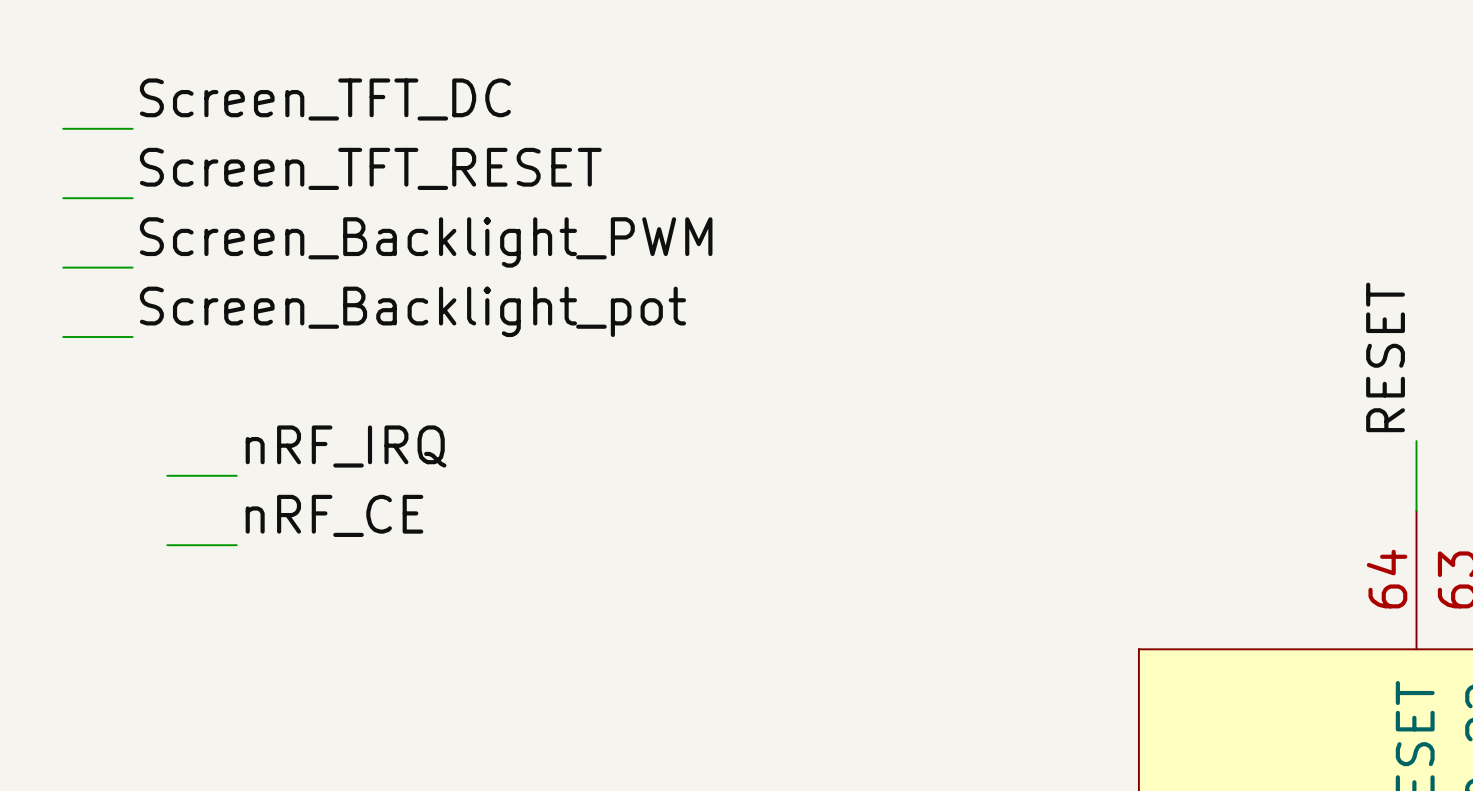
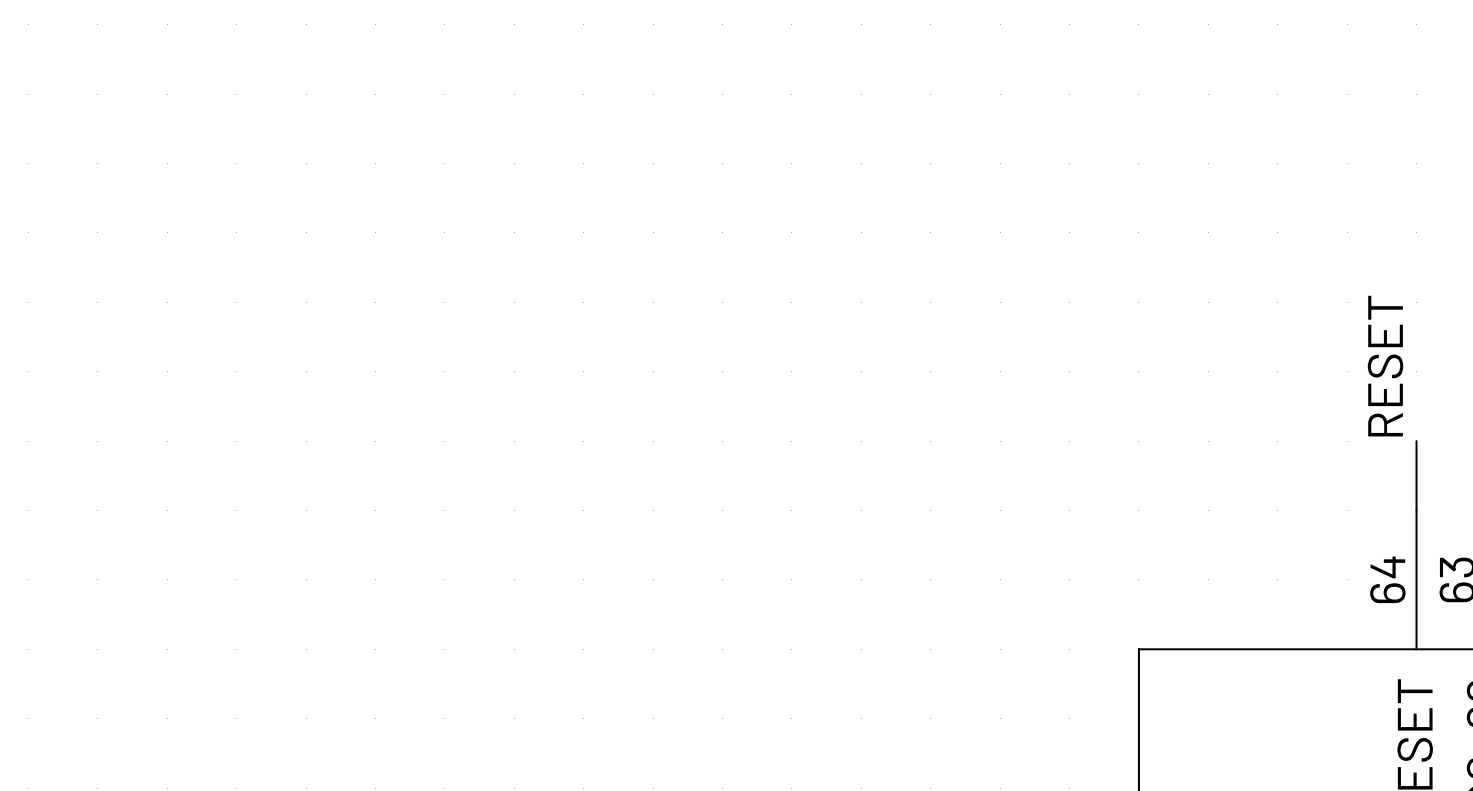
label: Screen_TFT_DC (325, 99) -> none
wire: (63, 128) (132, 128) -> none
label: Screen_TFT_RESET (370, 168) -> none
wire: (63, 198) (132, 198) -> none
label: Screen_Backlight_PWM (426, 242) -> none
wire: (63, 267) (132, 267) -> none
label: Screen_Backlight_pot (412, 311) -> none
wire: (63, 337) (132, 337) -> none
label: nRF_IRQ (346, 446) -> none
wire: (167, 475) (236, 475) -> none
label: nRF_CE (334, 515) -> none
wire: (167, 545) (236, 545) -> none

